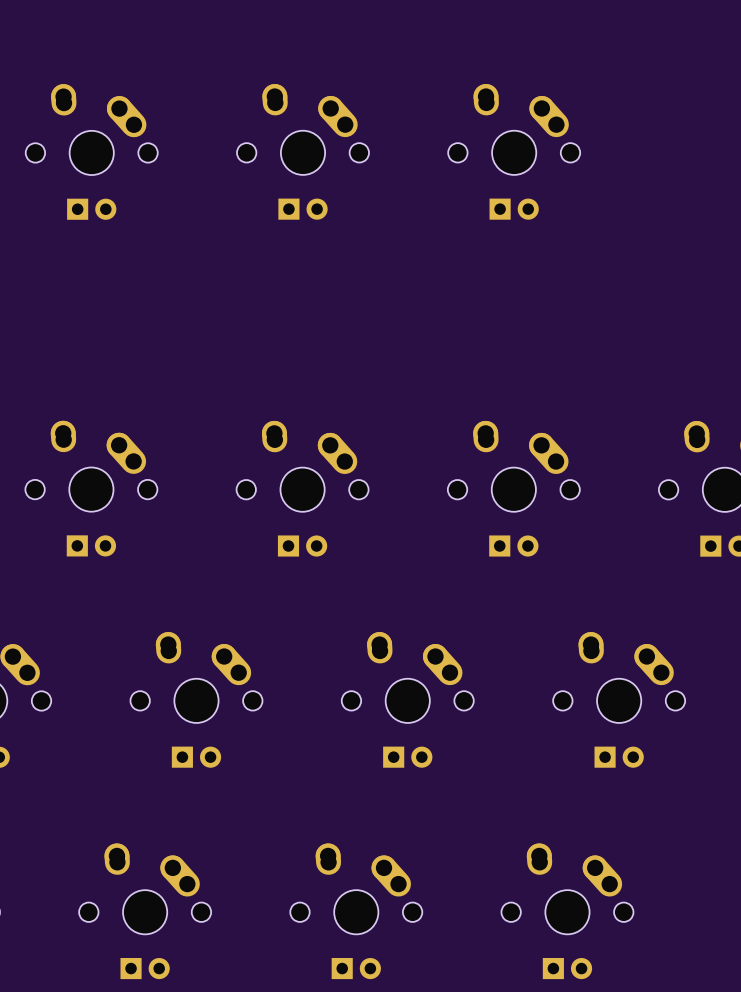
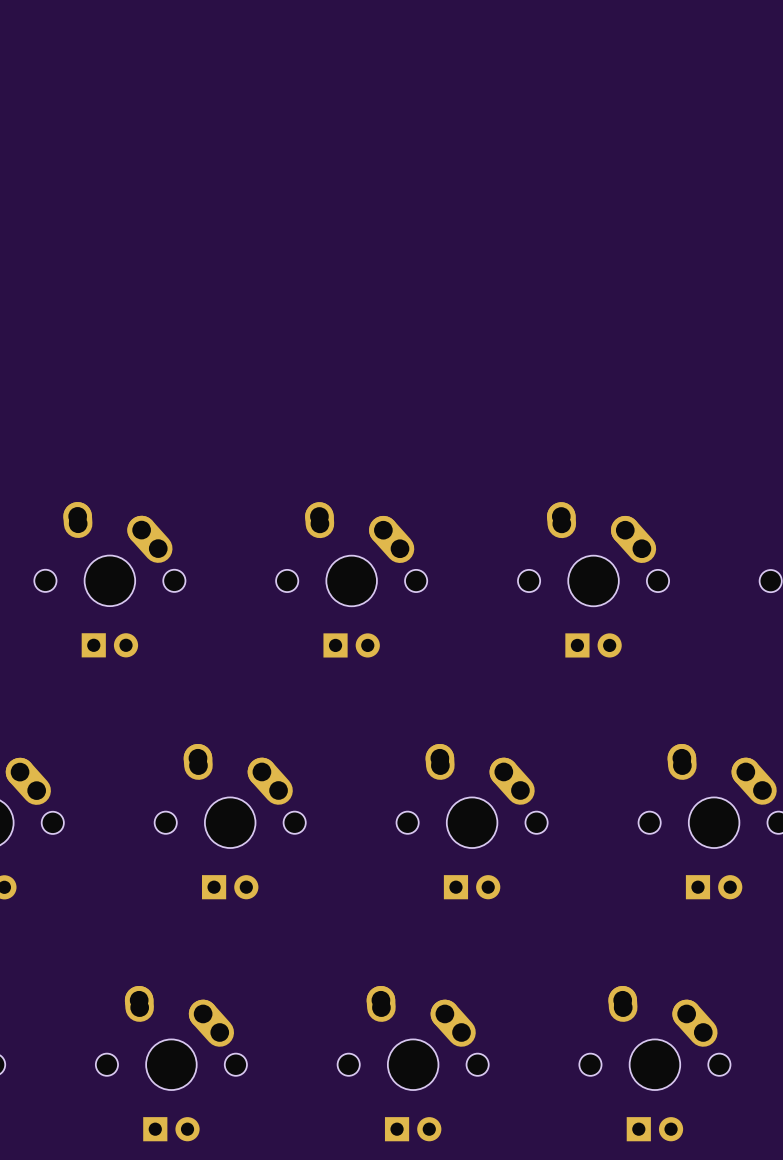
part: (91, 151) -> none
part: (303, 151) -> none
part: (514, 151) -> none

